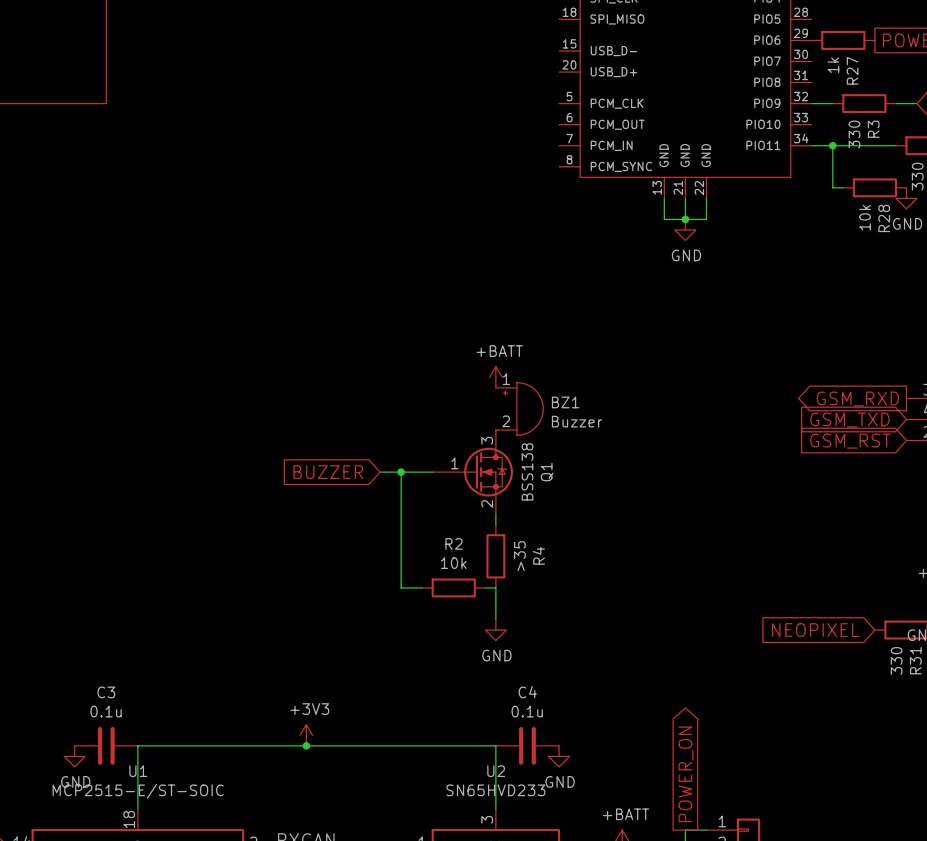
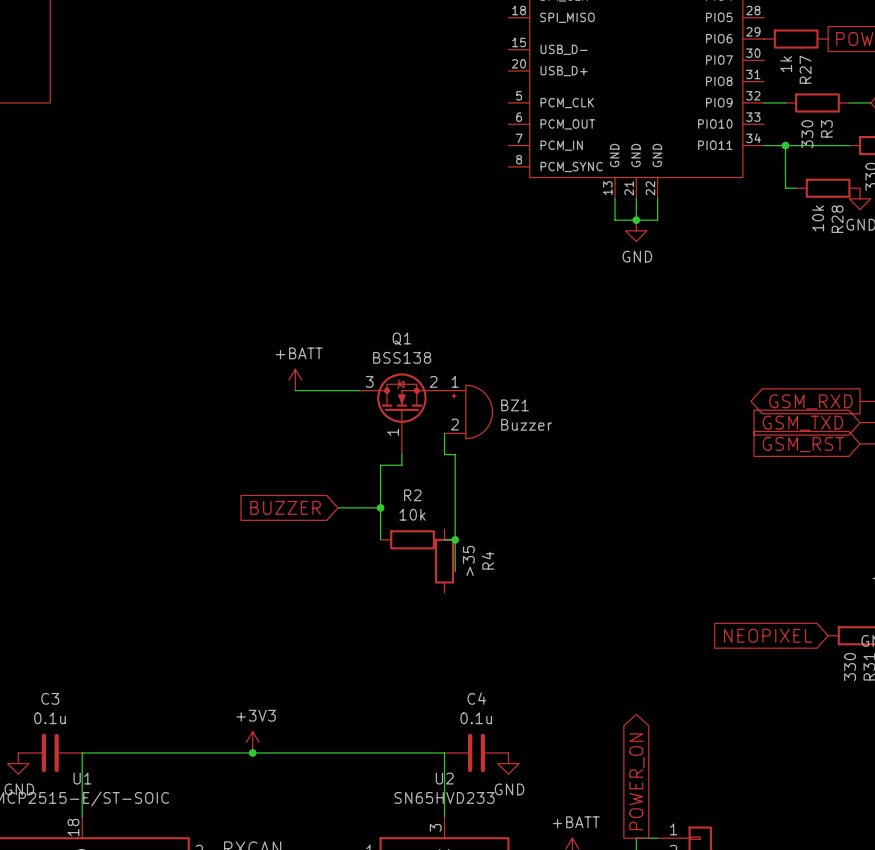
power symbol position: +BATT (495, 377) -> +BATT (295, 380)
wire: none -> (295, 390) (359, 390)
wire: none -> (444, 433) (444, 454) (455, 454) (455, 571)
wire: none -> (401, 454) (401, 465) (380, 465) (380, 539)
global label position: BUZZER (328, 472) -> BUZZER (285, 507)
wire: (380, 472) (432, 472) -> none
wire: (401, 472) (401, 587) (422, 587) -> none
junction position: (401, 472) -> (380, 507)
Q1 position: (472, 472) -> (401, 414)
Q1 rotation: 0° (488, 472) -> 90° counterclockwise (401, 398)
wire: none -> (337, 507) (380, 507)
wire: (495, 514) (495, 524) -> none
junction: none -> (455, 539)
R2 position: (453, 587) -> (412, 539)
wire: (485, 587) (495, 587) (495, 619) -> none
power symbol: GND (495, 630) -> none

